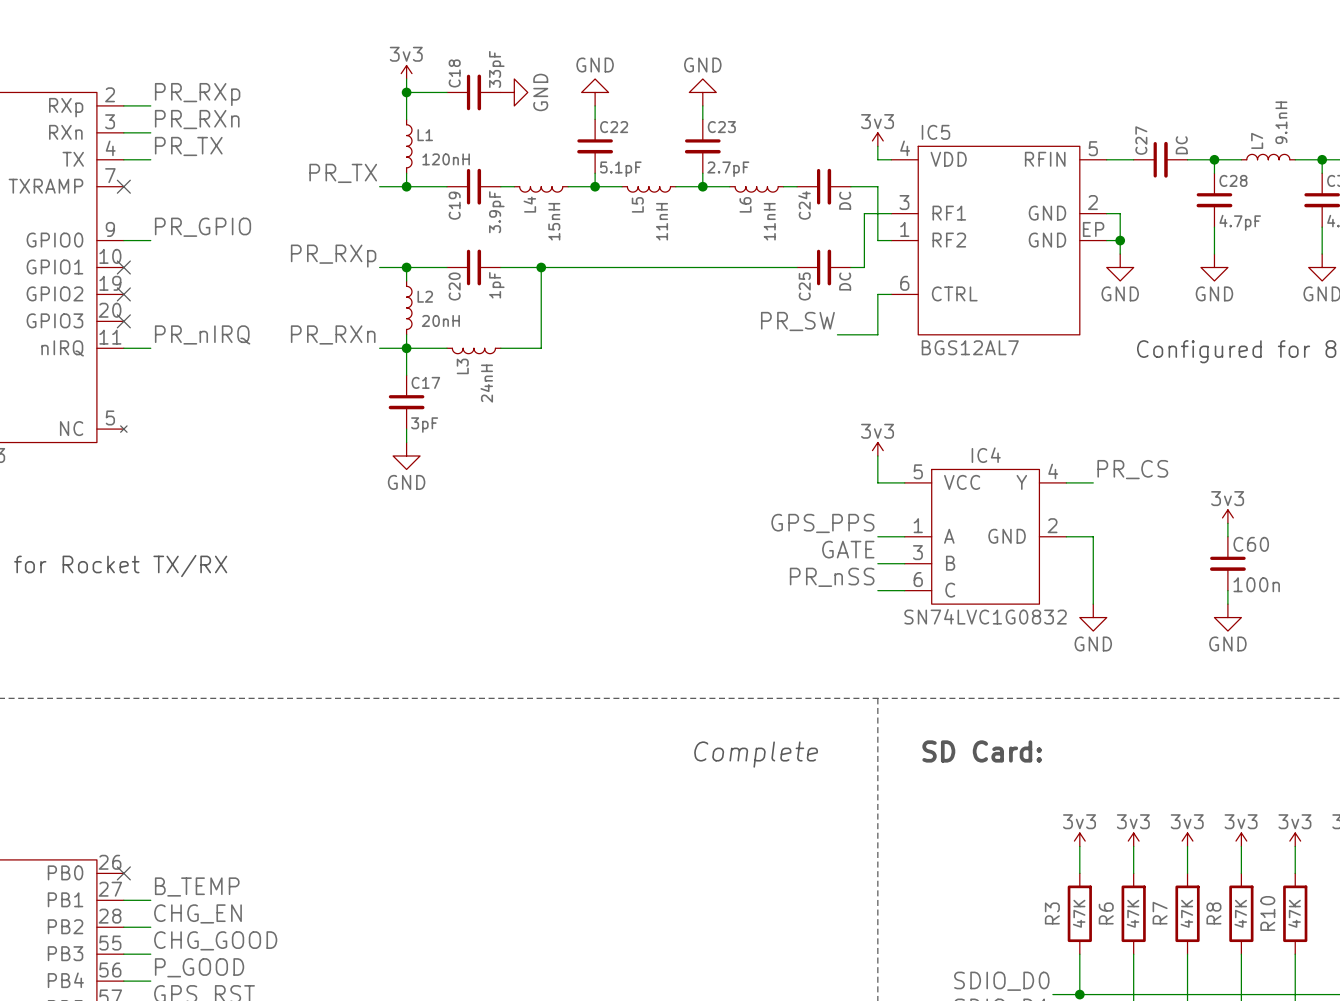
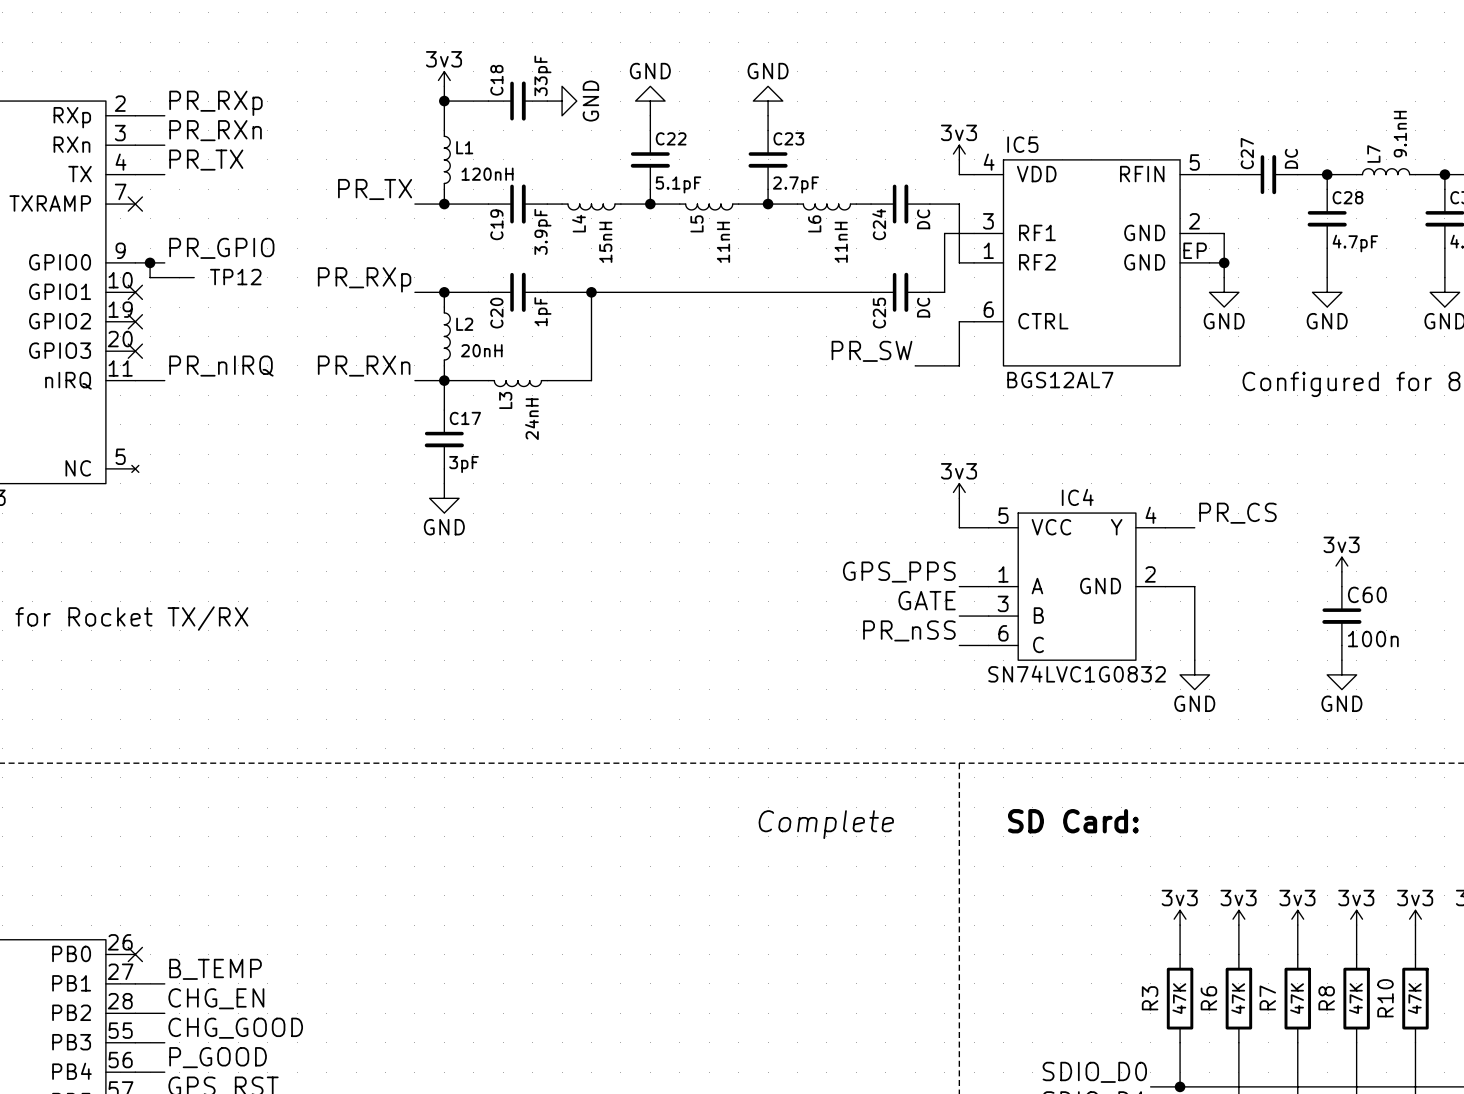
wire: none -> (150, 262) (150, 277) (179, 277)
junction: none -> (150, 262)
TP12: none -> (190, 277)

